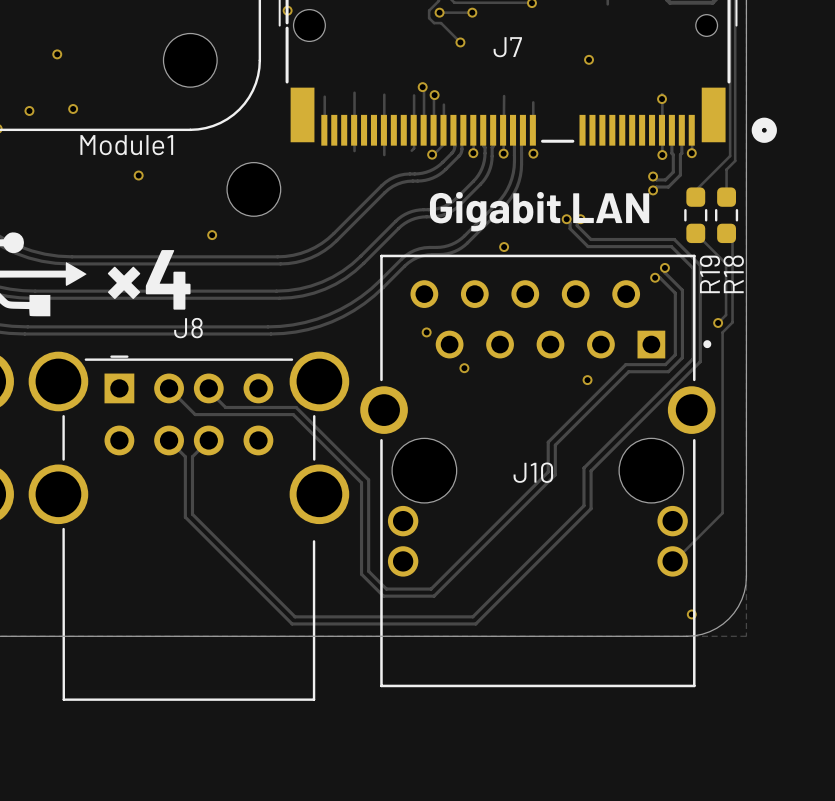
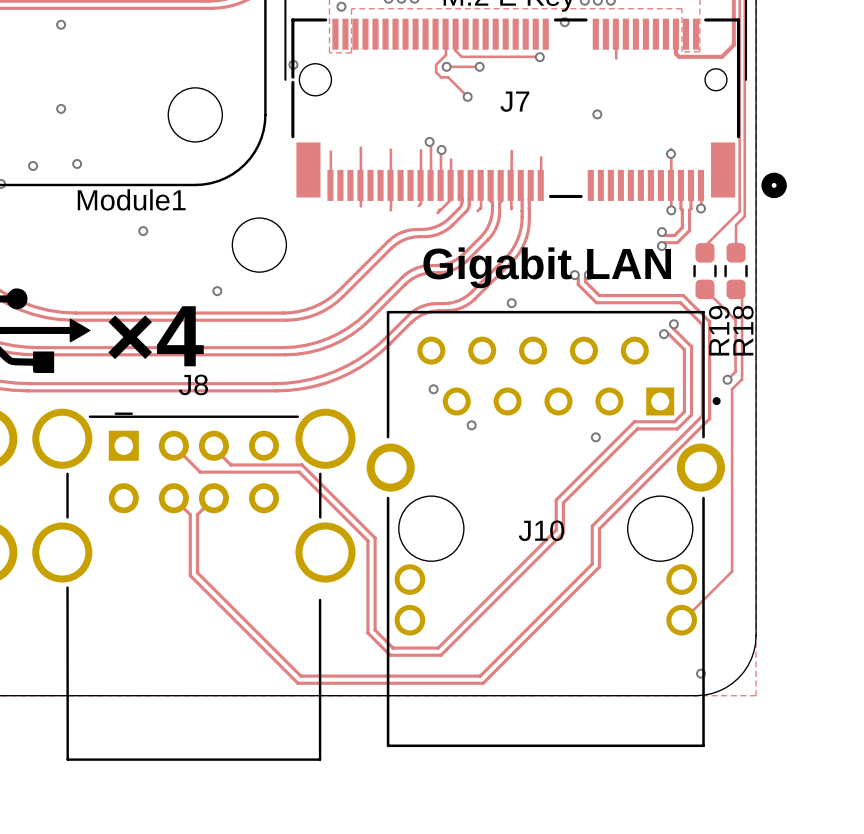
via: (473, 153) -> none
via: (503, 153) -> none
via: (533, 153) -> none
via: (432, 154) -> none

